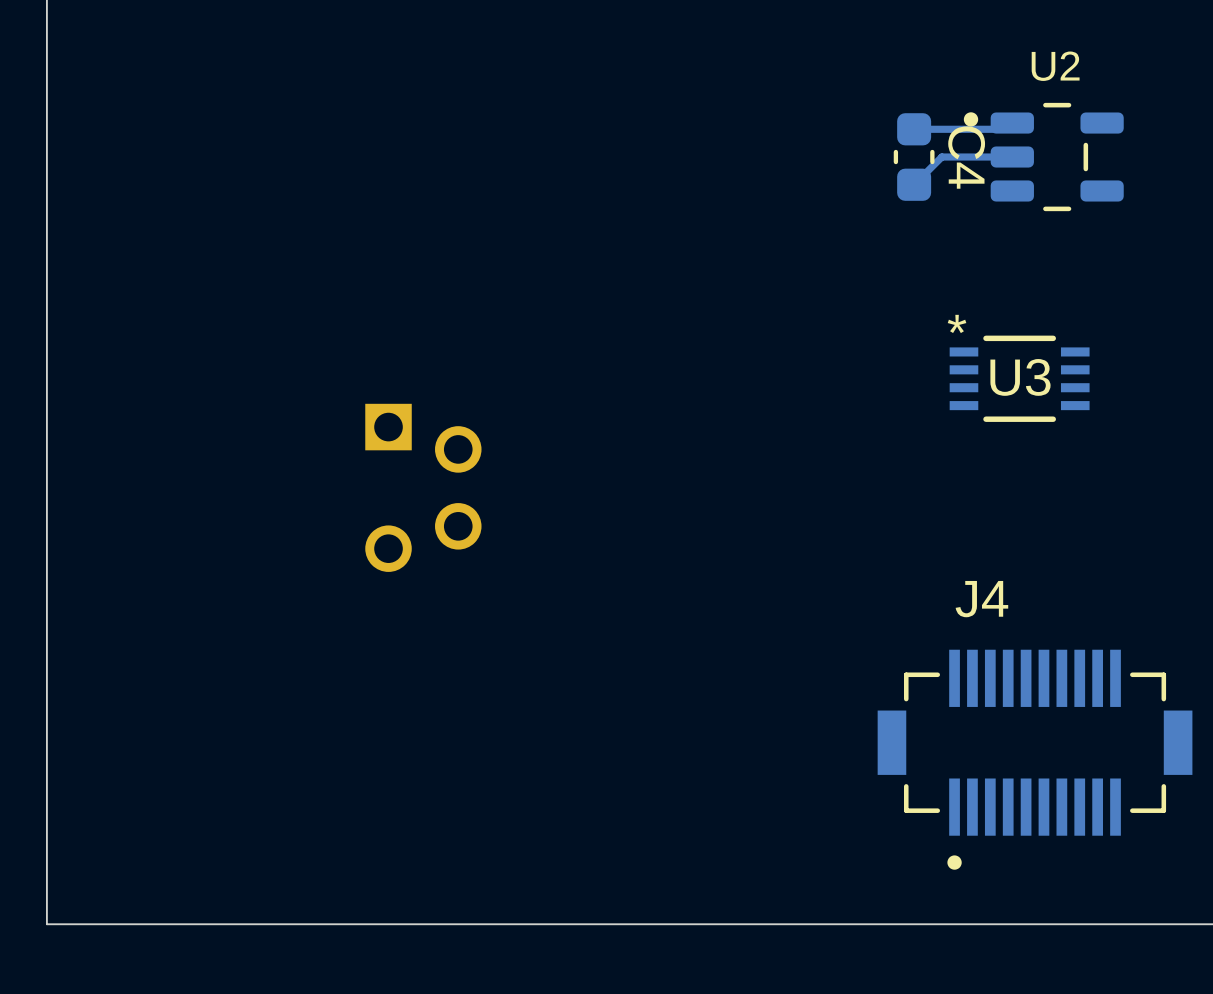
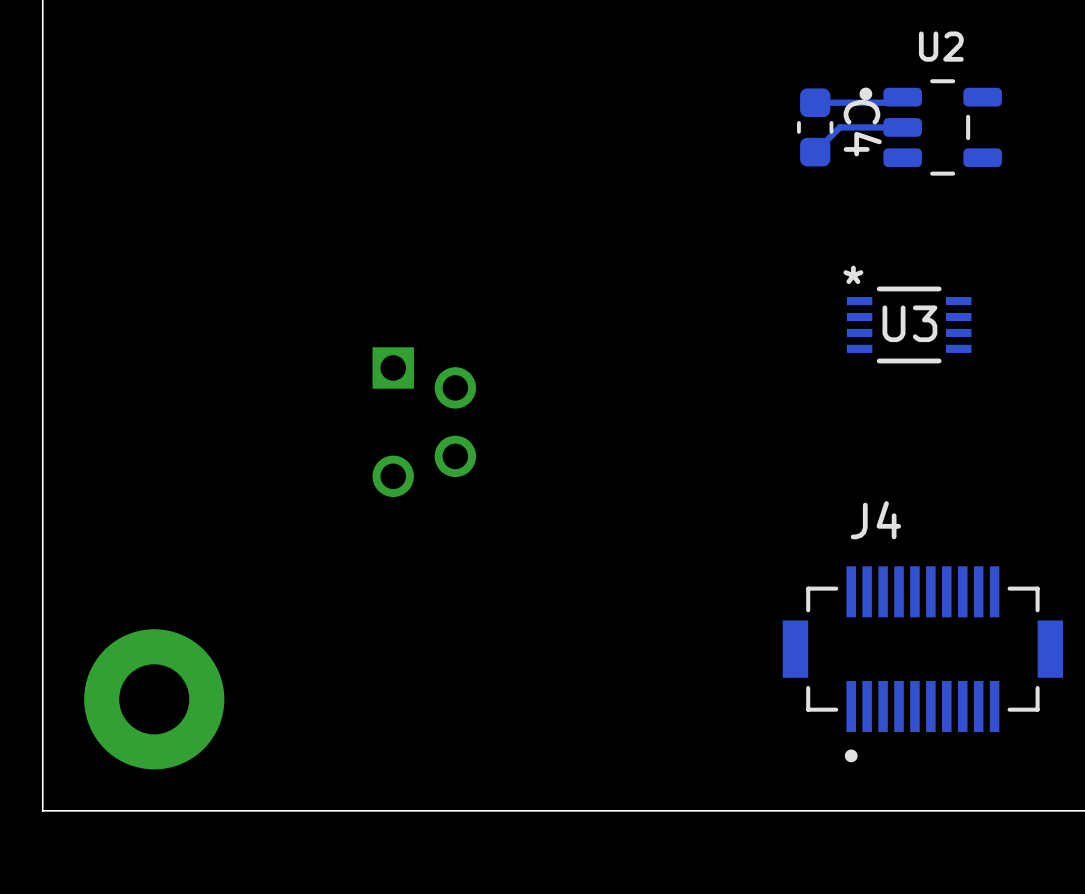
part position: (423, 487) -> (424, 422)
part: none -> (154, 699)

